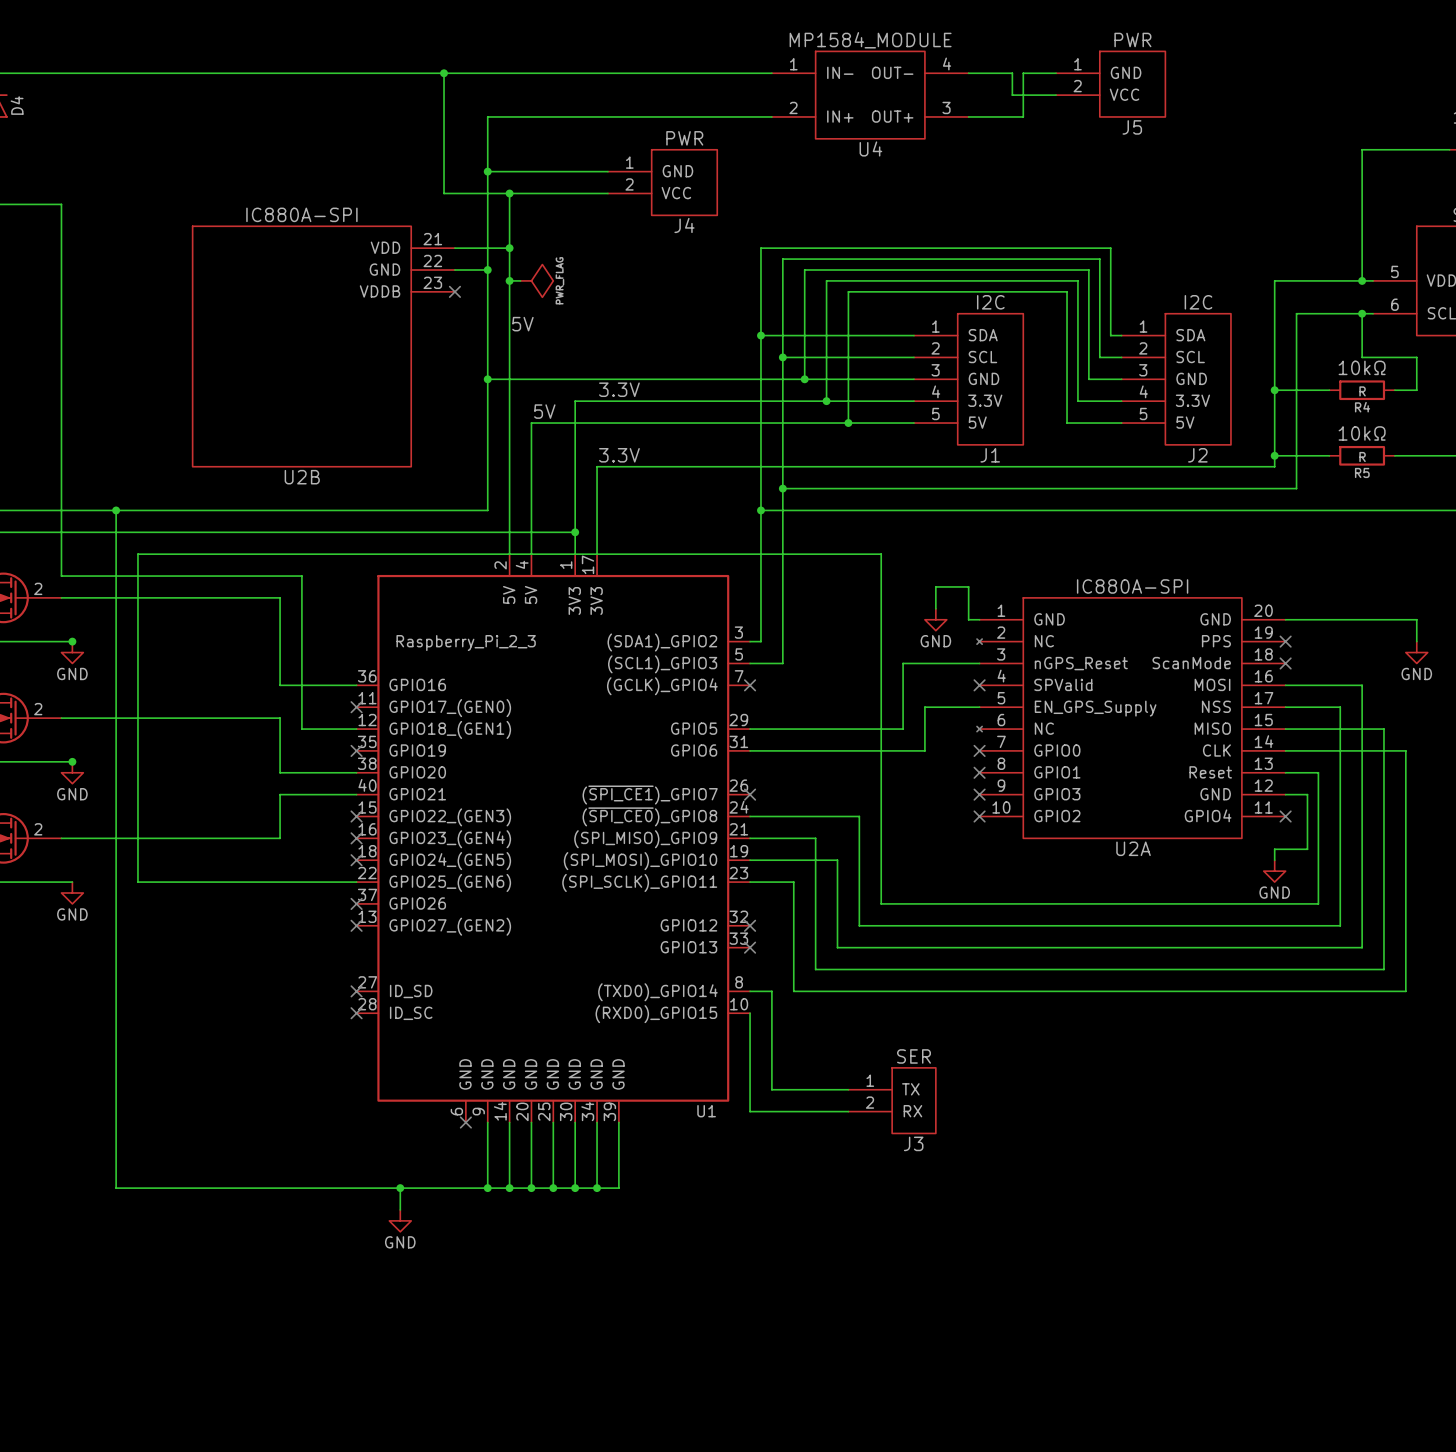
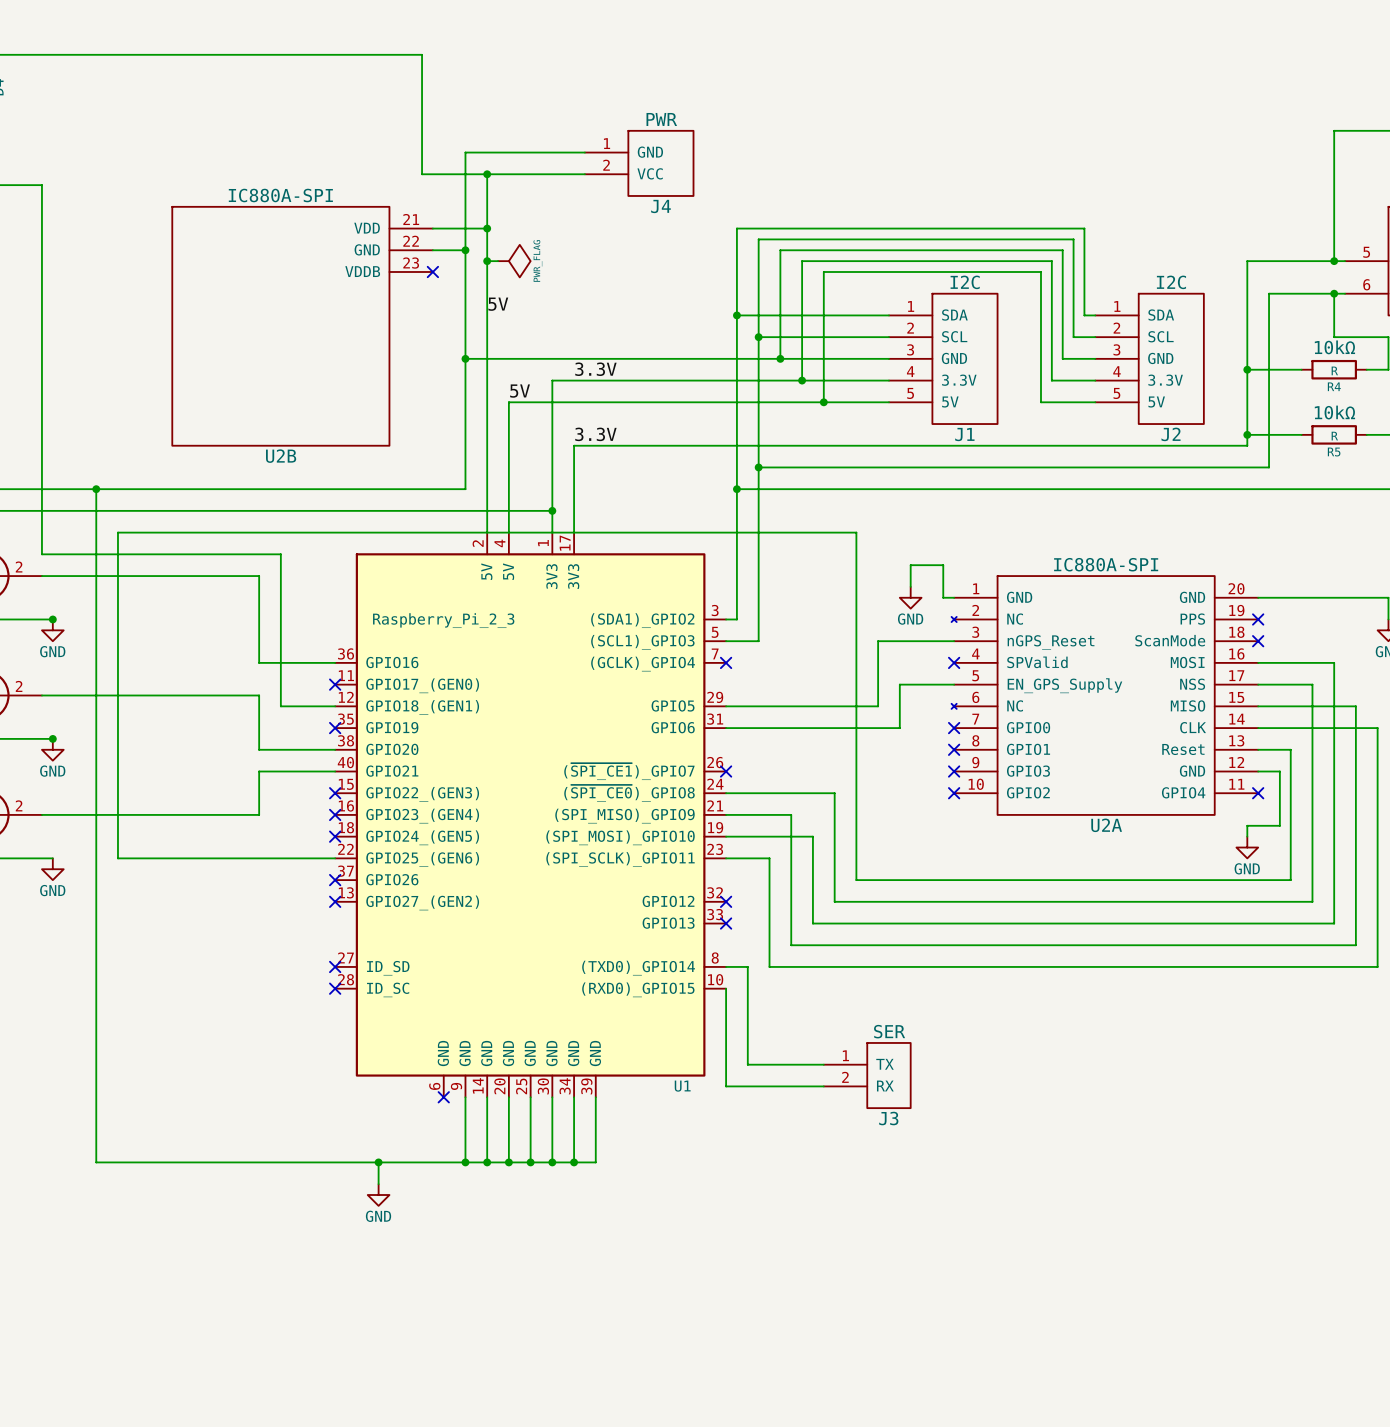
wire: (444, 73) (771, 73) -> none
junction: (444, 73) -> none
wire: (968, 73) (1012, 73) (1012, 95) (1056, 95) -> none
wire: (1056, 73) (1023, 73) (1023, 116) (968, 116) -> none
J5: PWR (1110, 84) -> none
U4: MP1584_MODULE (870, 95) -> none
wire: (771, 116) (487, 116) (487, 171) -> none
junction: (487, 171) -> none

